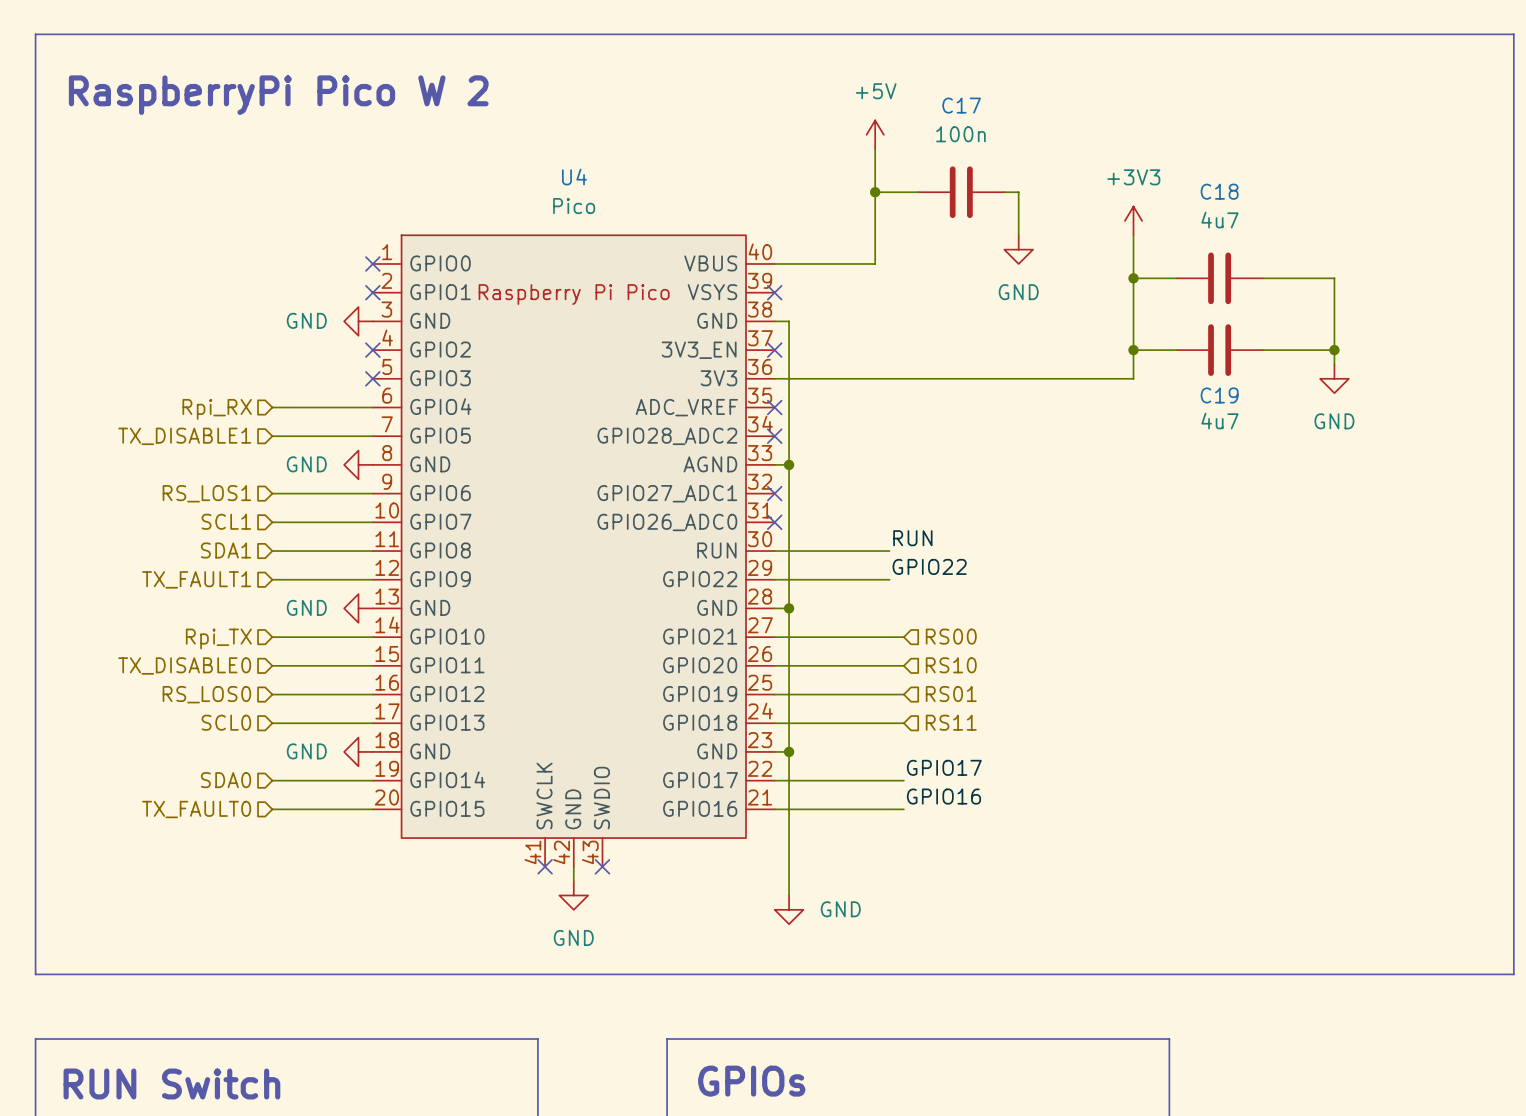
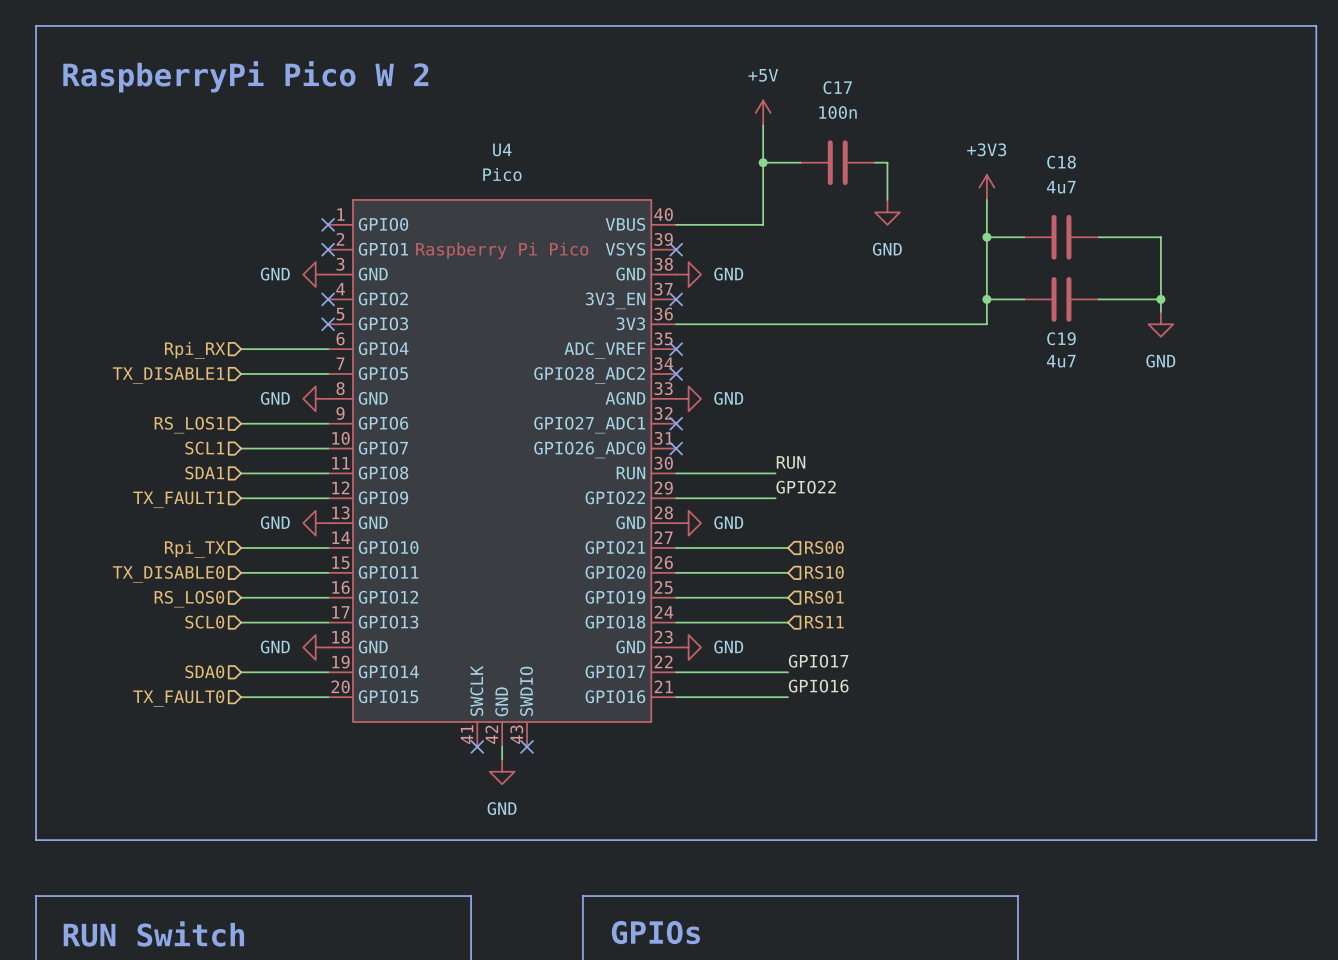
wire: (774, 321) (789, 321) (789, 895) -> none
power symbol: none -> GND (688, 274)
junction: (789, 464) -> none
power symbol: none -> GND (688, 398)
junction: (789, 608) -> none
power symbol: none -> GND (688, 523)
junction: (789, 751) -> none
power symbol: none -> GND (688, 647)
power symbol: GND (789, 909) -> none

